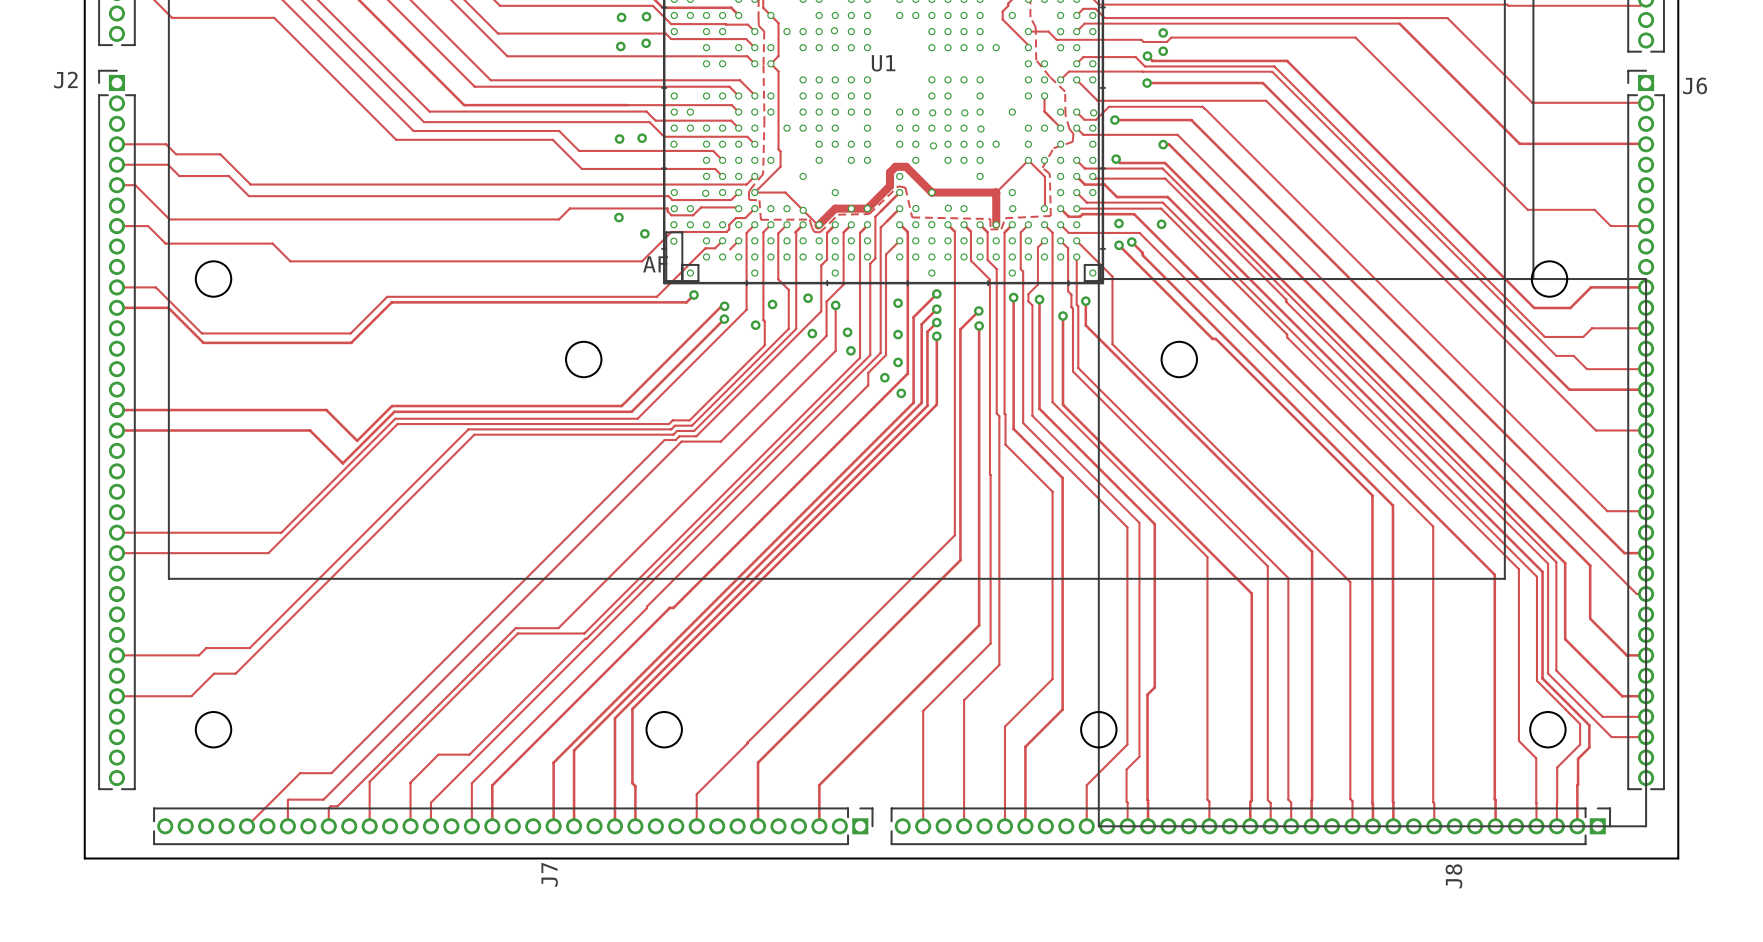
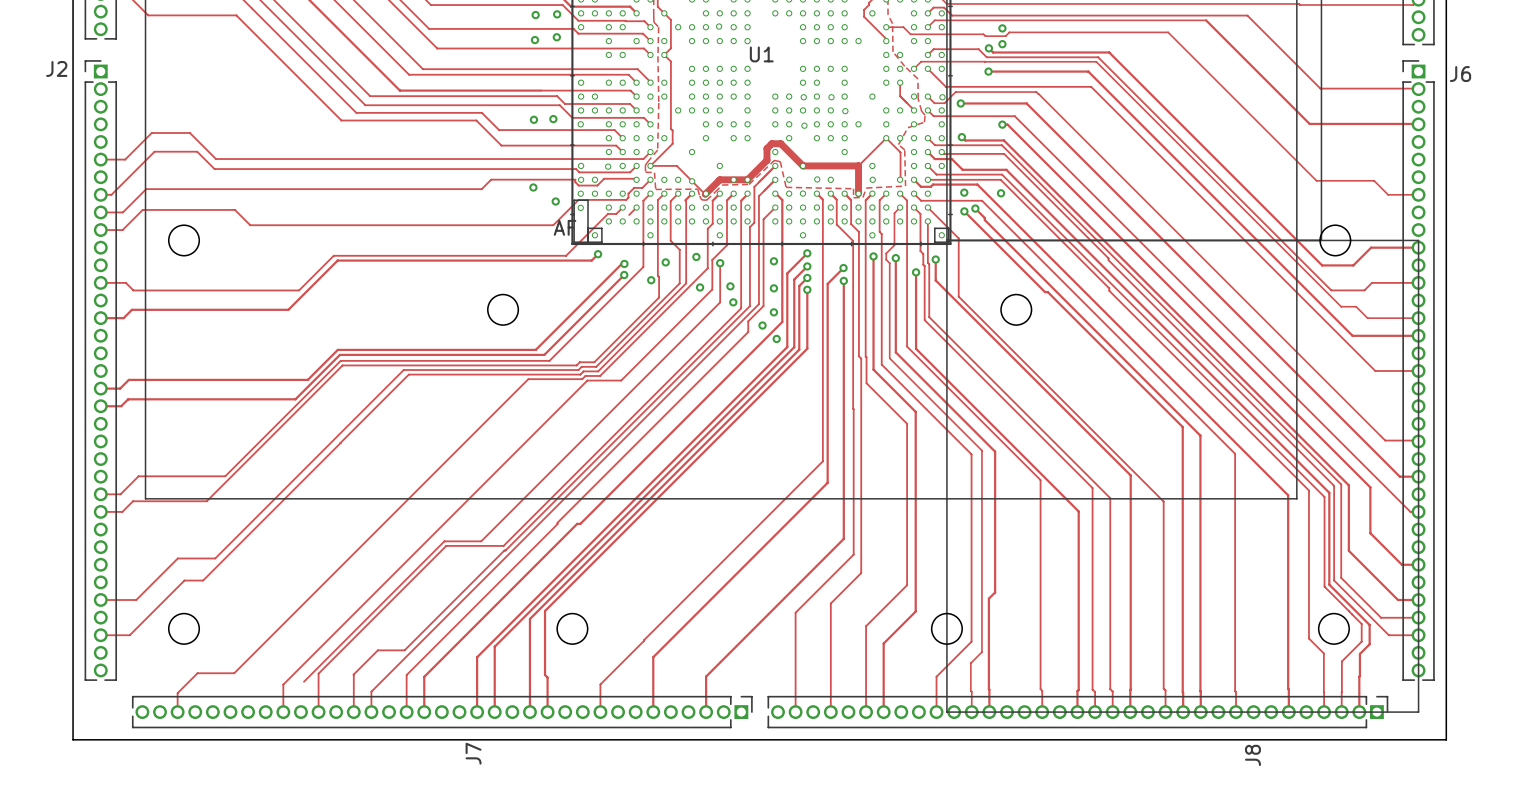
track: (116, 144) (166, 144) (176, 154) -> (116, 159) (125, 159) (151, 132)
track: (116, 164) (168, 164) (179, 176) -> (111, 194) (154, 151)
track: (135, 185) (169, 219) -> (100, 212) (122, 212) (146, 189)
track: (129, 226) (148, 226) (165, 243) -> (100, 230) (122, 230) (142, 209)
track: (116, 287) (155, 287) (201, 333) (350, 333) -> (100, 282) (125, 282) (133, 290) (299, 290) (302, 287)
track: (116, 307) (168, 307) (203, 342) (351, 342) -> (100, 318) (123, 318) (131, 309) (288, 309) (302, 295)
track: (116, 410) (326, 410) (357, 440) -> (100, 388) (120, 388) (128, 379) (307, 379)
track: (116, 430) (310, 430) (342, 463) -> (100, 406) (121, 406) (128, 399) (295, 399)
track: (664, 439) (331, 773) (300, 773) (247, 826) -> (572, 379) (528, 379) (234, 673) (197, 673) (177, 693) (177, 712)
track: (116, 532) (281, 532) -> (100, 494) (120, 494) (138, 476) (225, 476) (242, 459)
track: (116, 553) (268, 553) -> (100, 511) (122, 511) (133, 501) (206, 501) (231, 476)
track: (116, 655) (199, 655) -> none
track: (158, 696) (191, 696) -> (136, 600) (171, 564)
track: none -> (165, 600) (129, 635) (100, 635)
track: (352, 791) (337, 806) (330, 806) (328, 808) -> (283, 684) (283, 696)
track: (328, 794) (323, 799) (288, 799) (287, 826) -> none

